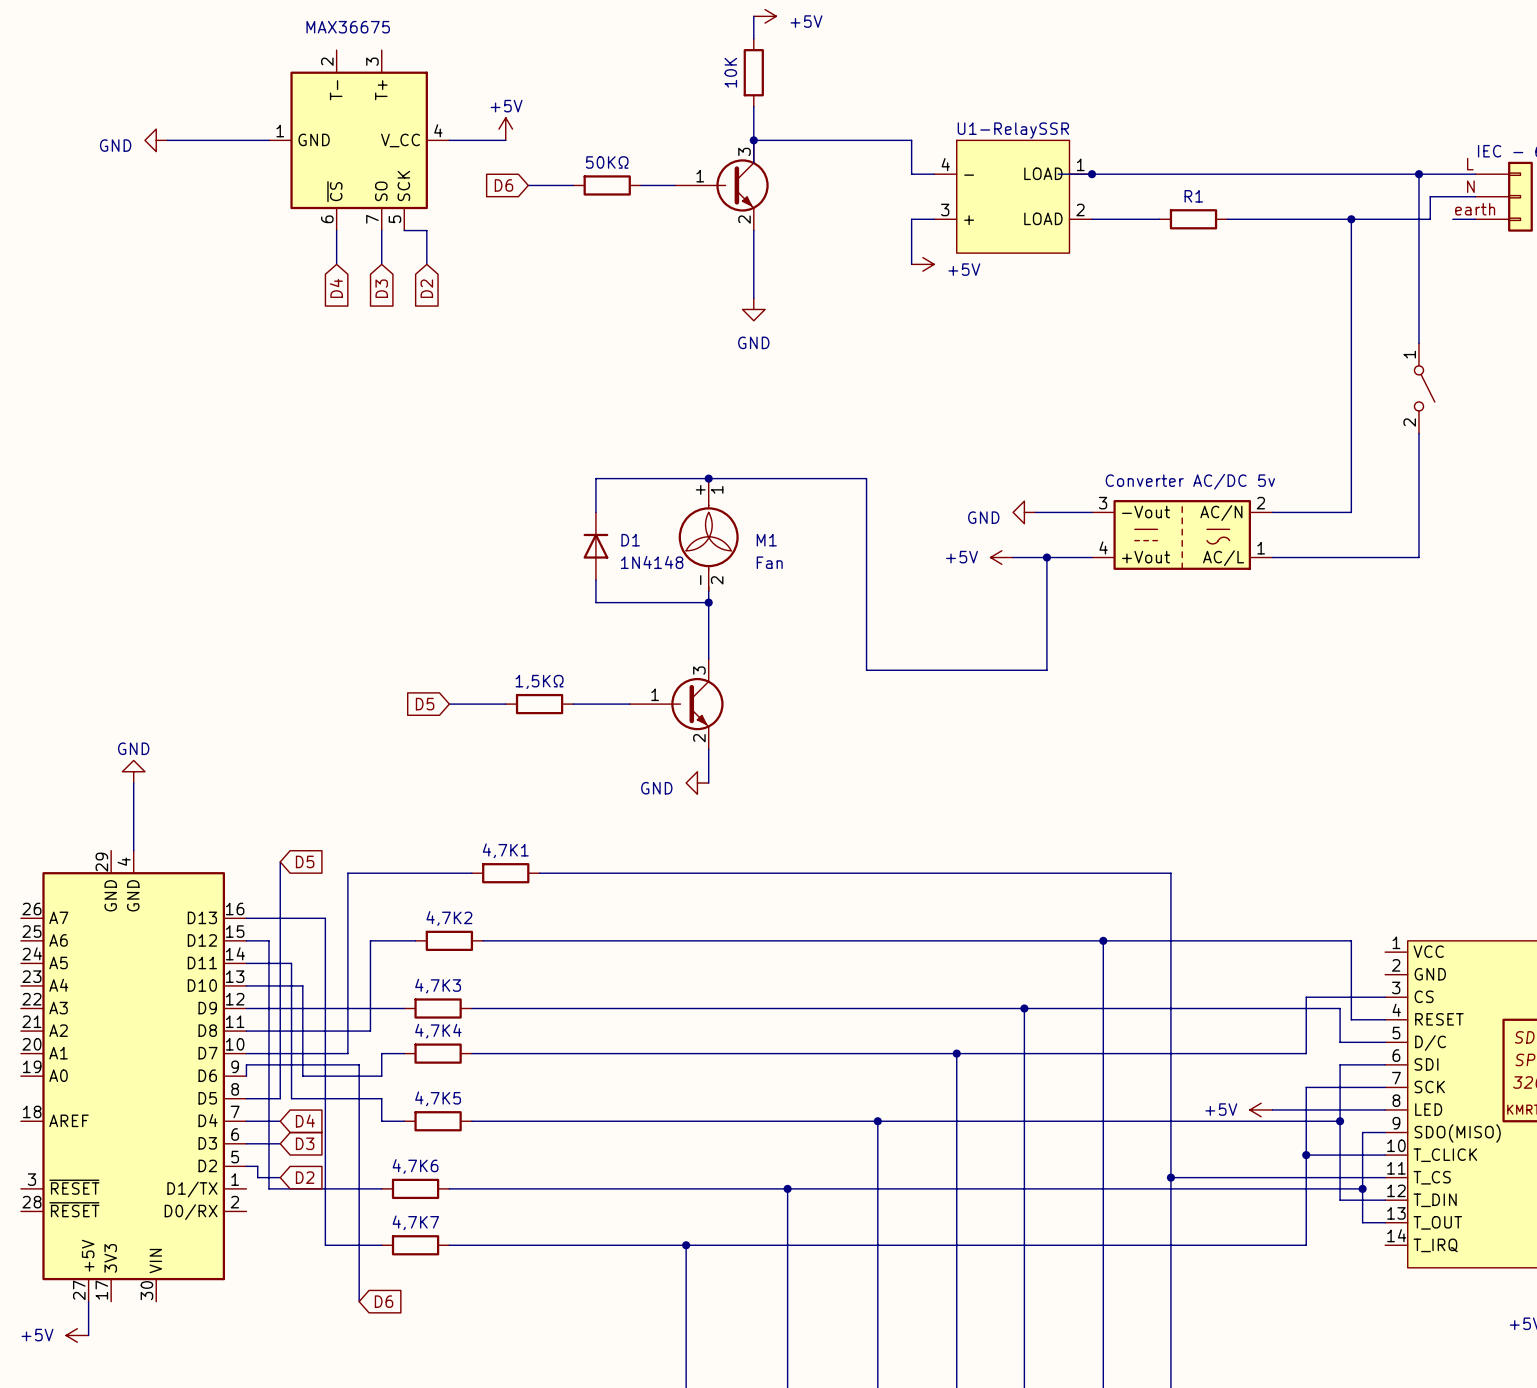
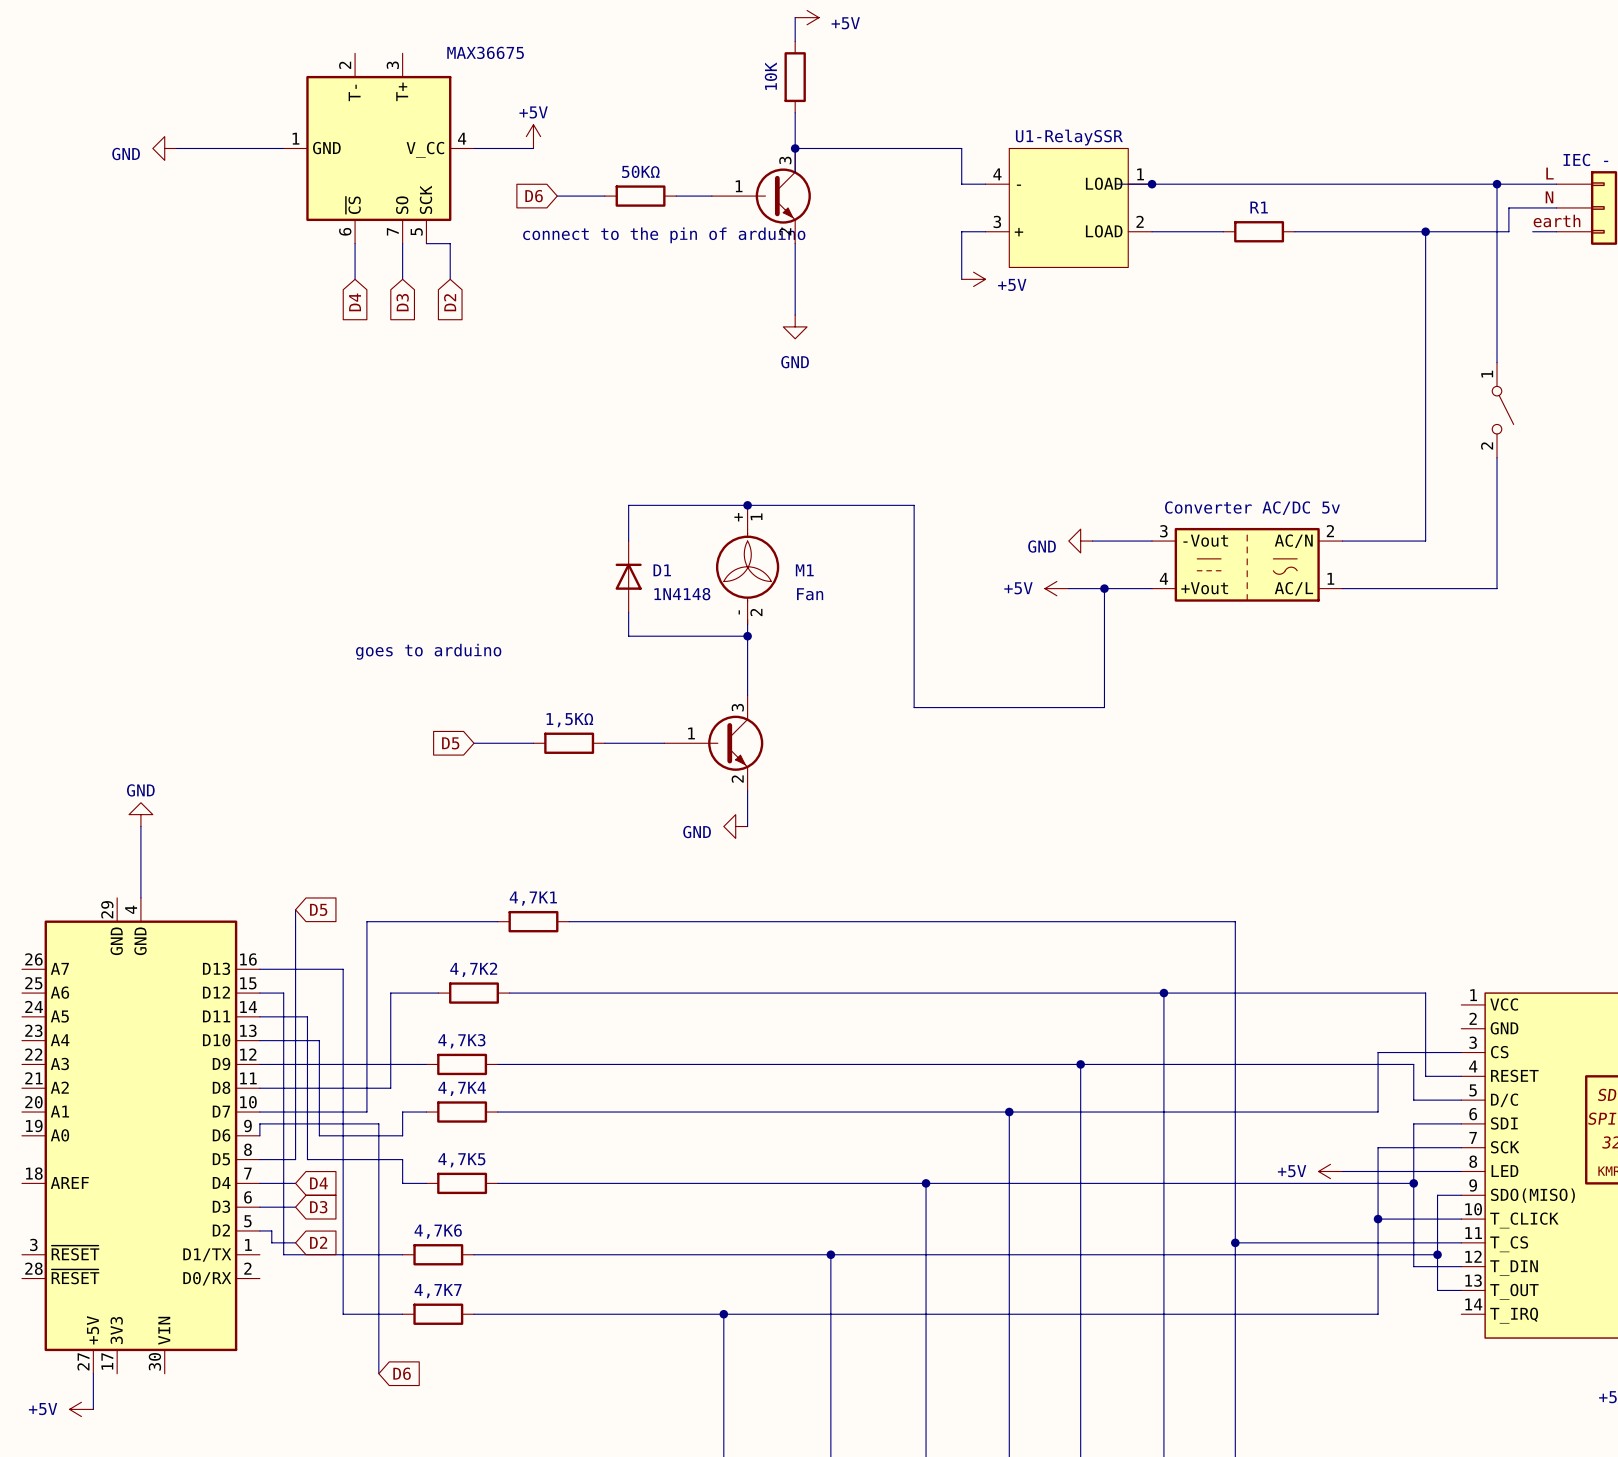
part value position: MAX36675 (348, 27) -> MAX36675 (485, 52)
text: none -> connect to the pin of arduino (664, 235)
text: none -> goes to arduino (428, 651)

